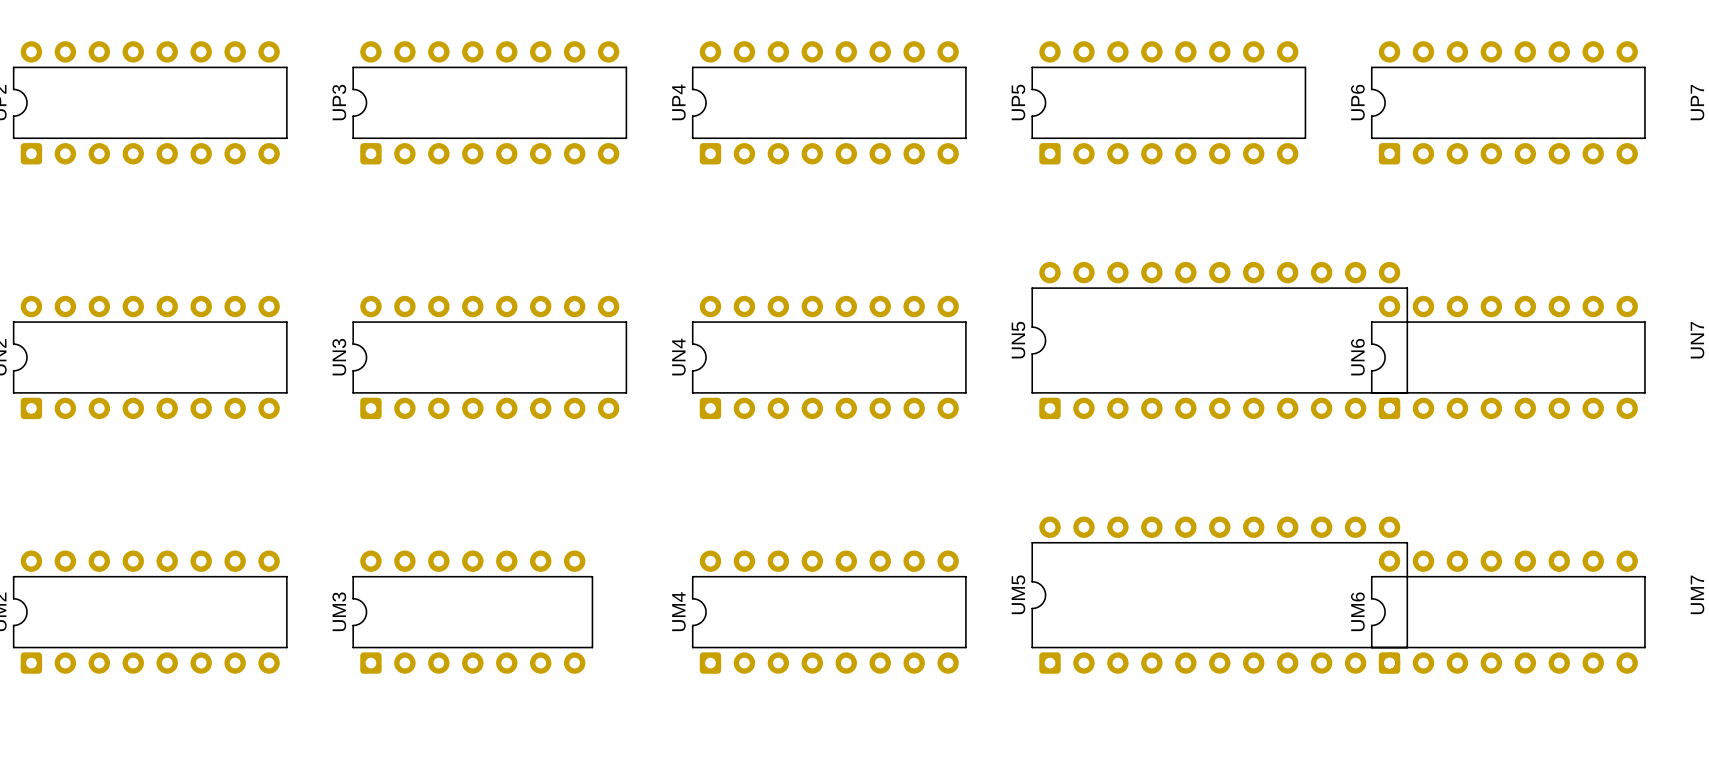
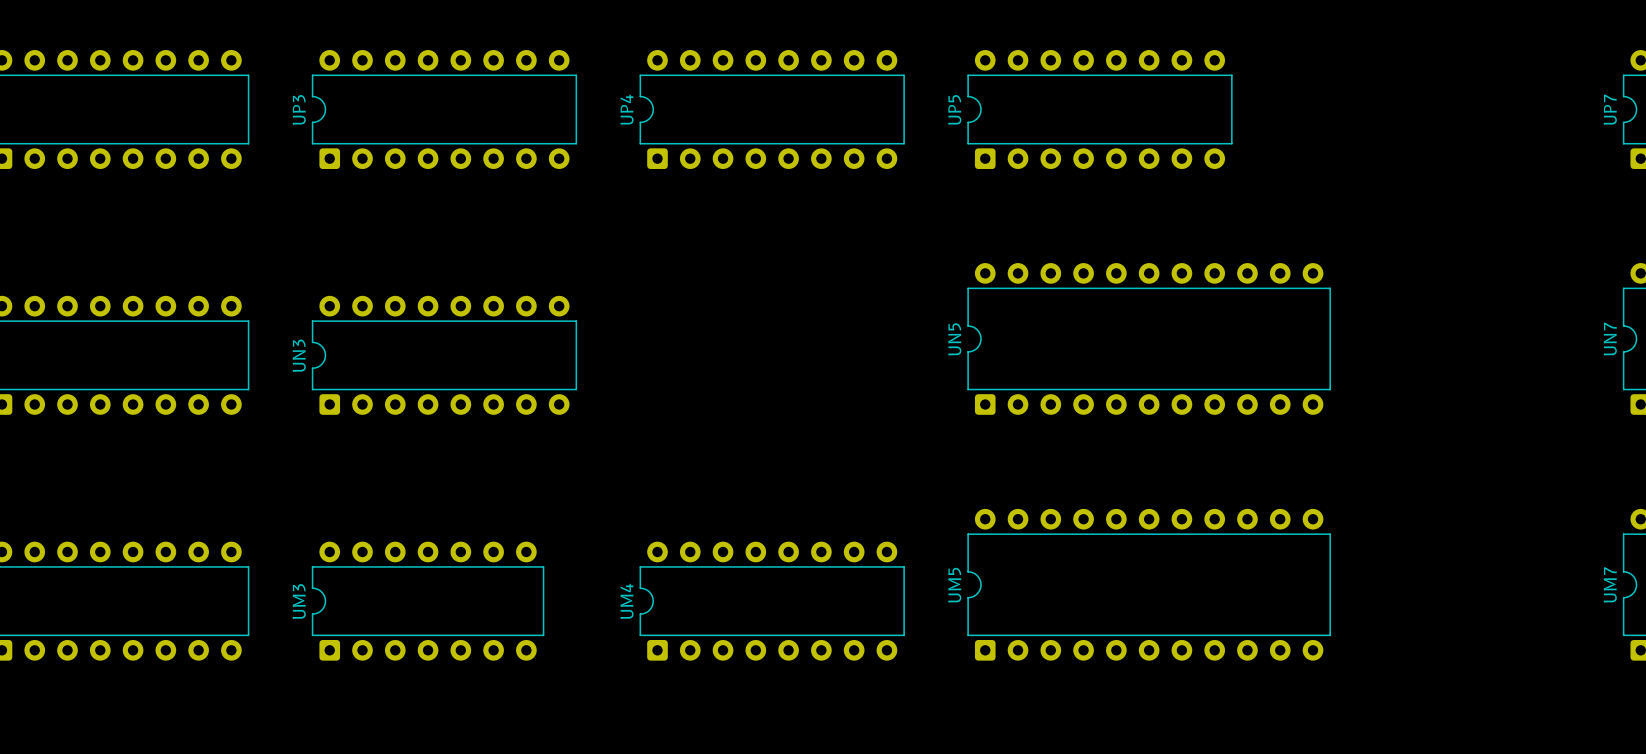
UP6: (1508, 102) -> none
UN4: (829, 357) -> none
UN6: (1508, 357) -> none
UM6: (1508, 612) -> none

